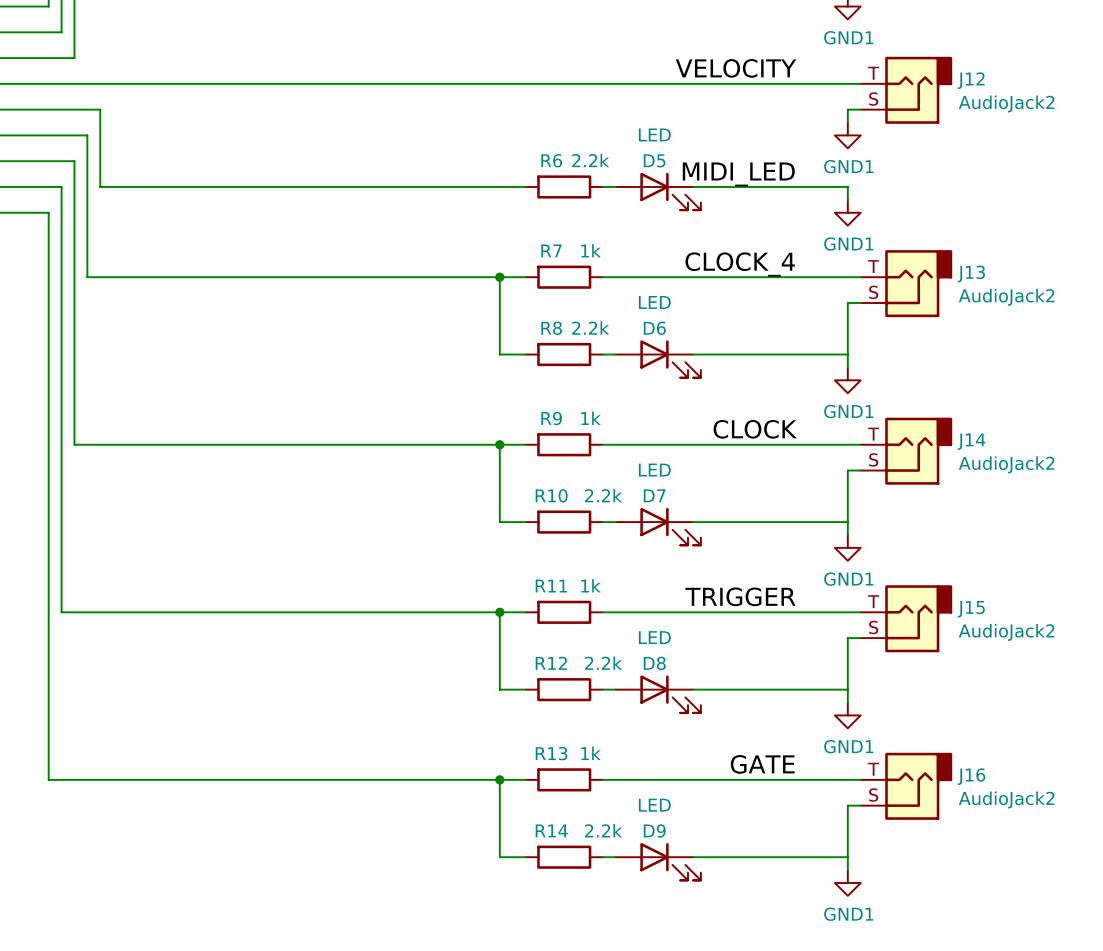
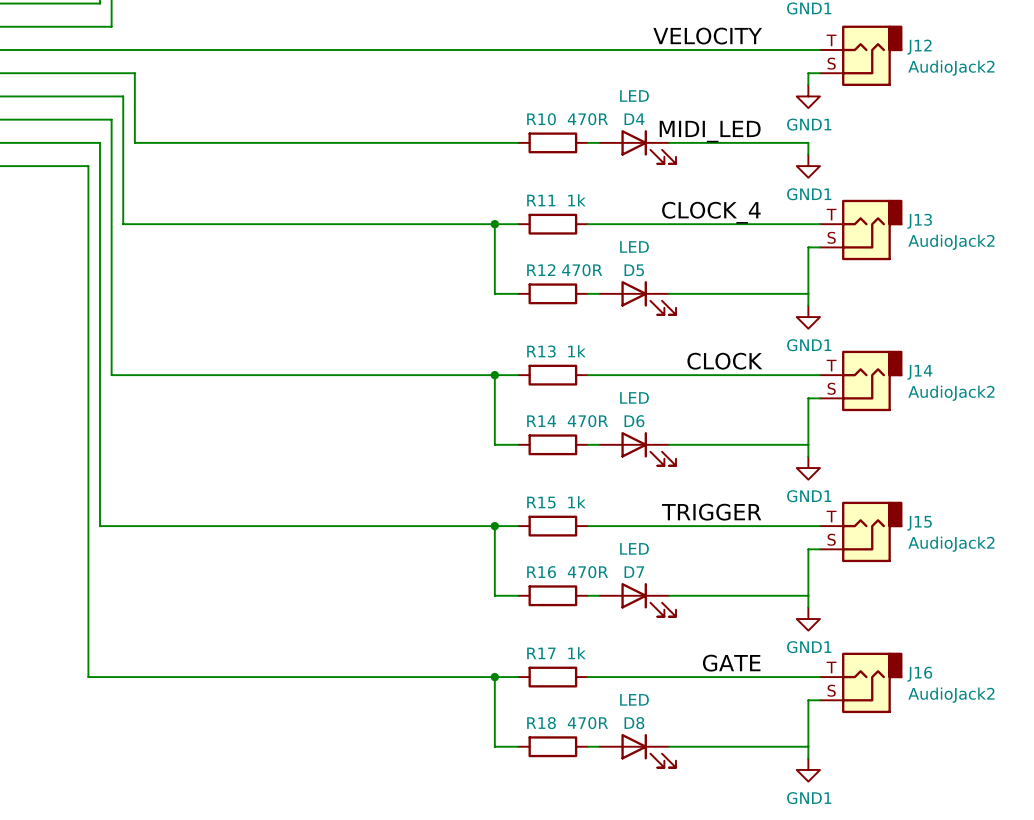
R6 name: R6 (551, 160) -> R10 (541, 119)
R6 value: 2.2k (590, 160) -> 470R (587, 119)
D5 name: D5 (654, 160) -> D4 (634, 119)
R7 name: R7 (551, 250) -> R11 (541, 200)
R8 name: R8 (551, 328) -> R12 (541, 270)
R8 value: 2.2k (590, 328) -> 470R (582, 270)
D6 name: D6 (654, 328) -> D5 (634, 270)
R9 name: R9 (551, 418) -> R13 (541, 351)
R10 name: R10 (551, 495) -> R14 (541, 421)
R10 value: 2.2k (603, 495) -> 470R (587, 421)
D7 name: D7 (654, 495) -> D6 (634, 421)
R11 name: R11 (551, 586) -> R15 (541, 502)
R12 name: R12 (551, 663) -> R16 (541, 572)
R12 value: 2.2k (603, 663) -> 470R (587, 572)
D8 name: D8 (654, 663) -> D7 (634, 572)
R13 name: R13 (551, 753) -> R17 (541, 653)
R14 name: R14 (551, 830) -> R18 (541, 723)
R14 value: 2.2k (603, 830) -> 470R (587, 723)
D9 name: D9 (654, 830) -> D8 (634, 723)

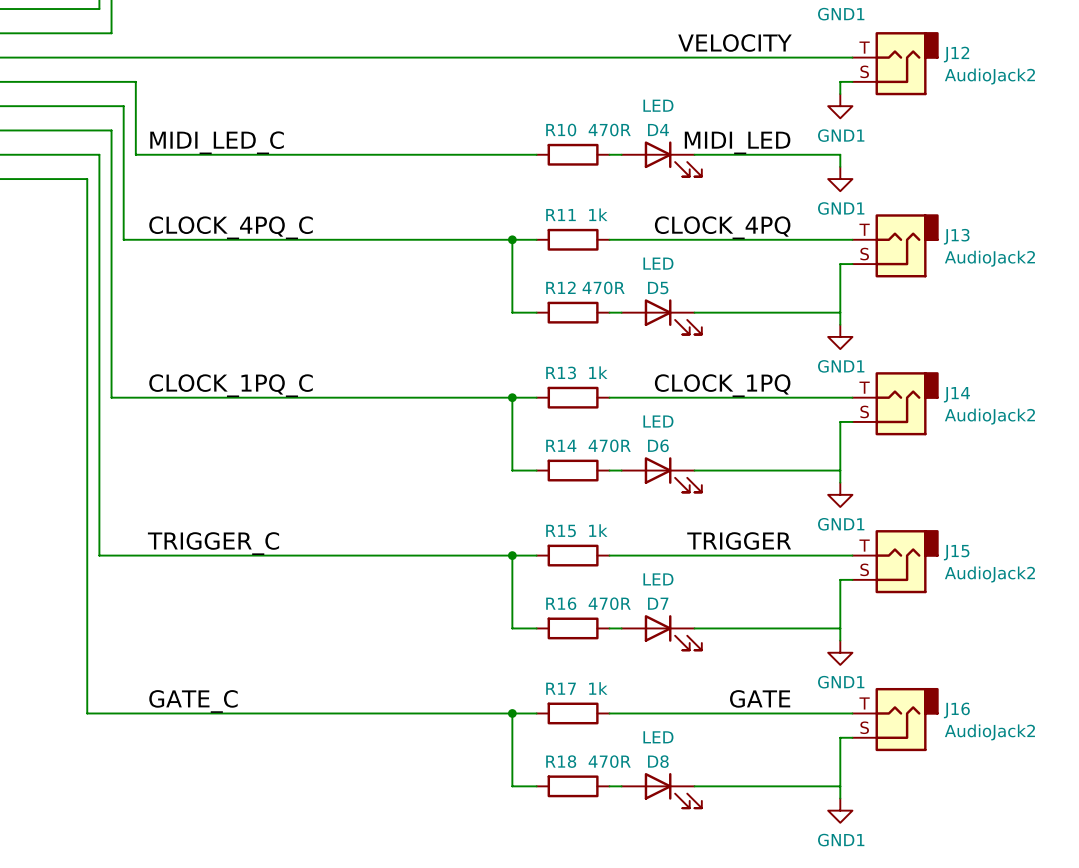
label: none -> MIDI_LED_C (217, 142)
label: none -> CLOCK_4PQ_C (231, 227)
label: CLOCK_4 (711, 212) -> CLOCK_4PQ (722, 227)
label: CLOCK (724, 361) -> CLOCK_1PQ (722, 385)
label: none -> CLOCK_1PQ_C (231, 385)
label: none -> TRIGGER_C (213, 543)
label: none -> GATE_C (193, 701)

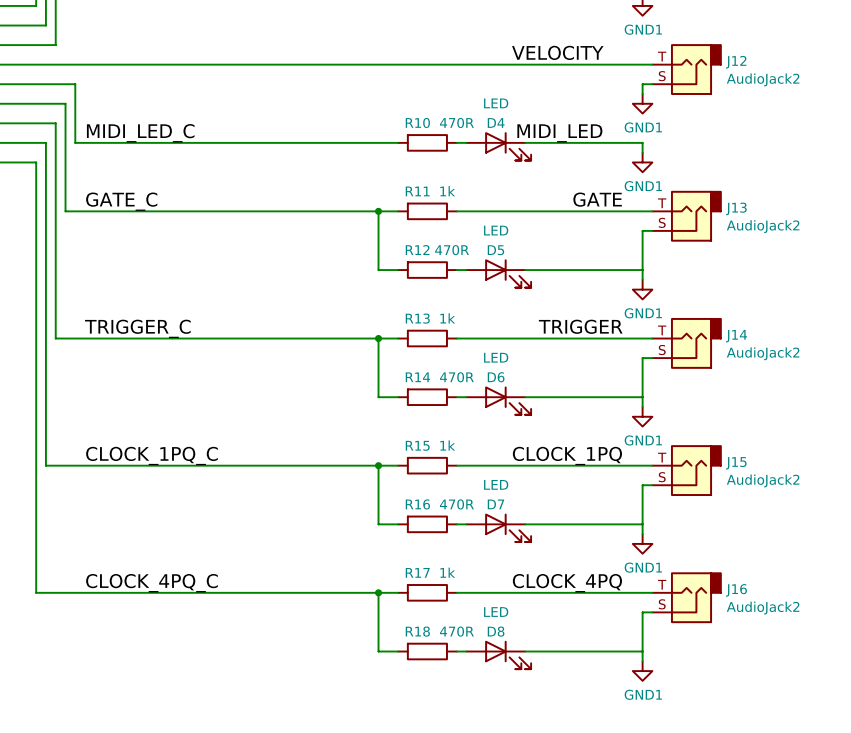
label: none -> GATE (597, 199)
label: CLOCK_4PQ_C (231, 227) -> GATE_C (121, 201)
label: CLOCK_4PQ (722, 227) -> none
label: CLOCK_1PQ_C (231, 385) -> TRIGGER_C (137, 328)
label position: CLOCK_1PQ (722, 385) -> CLOCK_1PQ (567, 456)
label position: TRIGGER (739, 541) -> TRIGGER (580, 326)
label: TRIGGER_C (213, 543) -> CLOCK_1PQ_C (151, 456)
label: GATE (760, 698) -> none
label: GATE_C (193, 701) -> CLOCK_4PQ_C (151, 583)
label: none -> CLOCK_4PQ (567, 583)

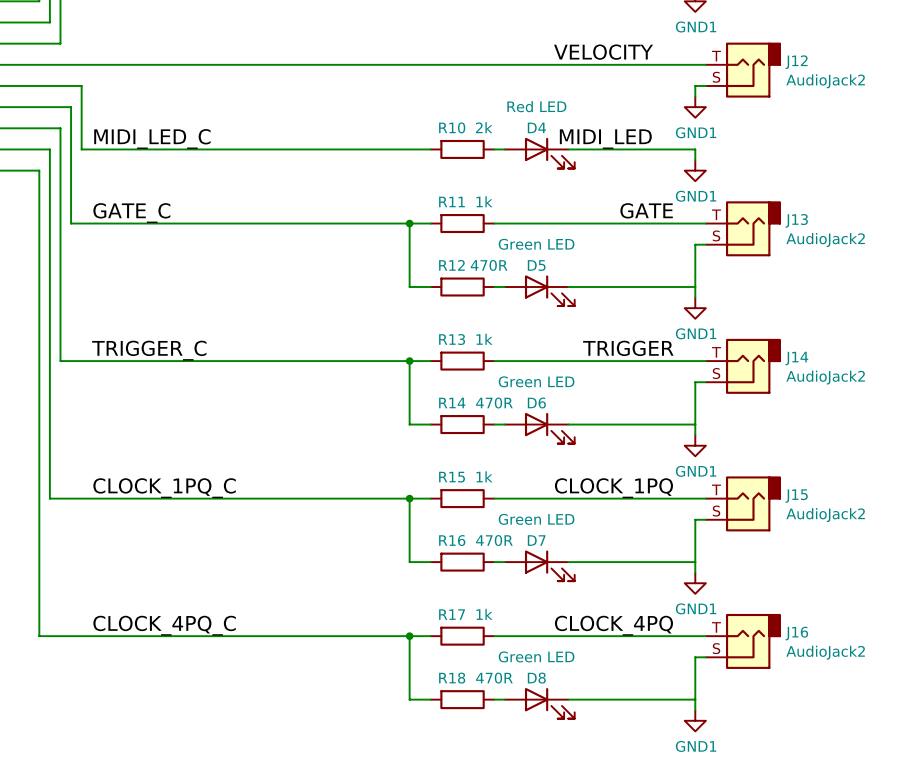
D4 value: LED (496, 103) -> Red LED (536, 106)
R10 value: 470R (456, 122) -> 2k (484, 127)
D5 value: LED (496, 230) -> Green LED (536, 244)
D6 value: LED (496, 357) -> Green LED (536, 381)
D7 value: LED (496, 484) -> Green LED (536, 519)
D8 value: LED (496, 612) -> Green LED (536, 656)

